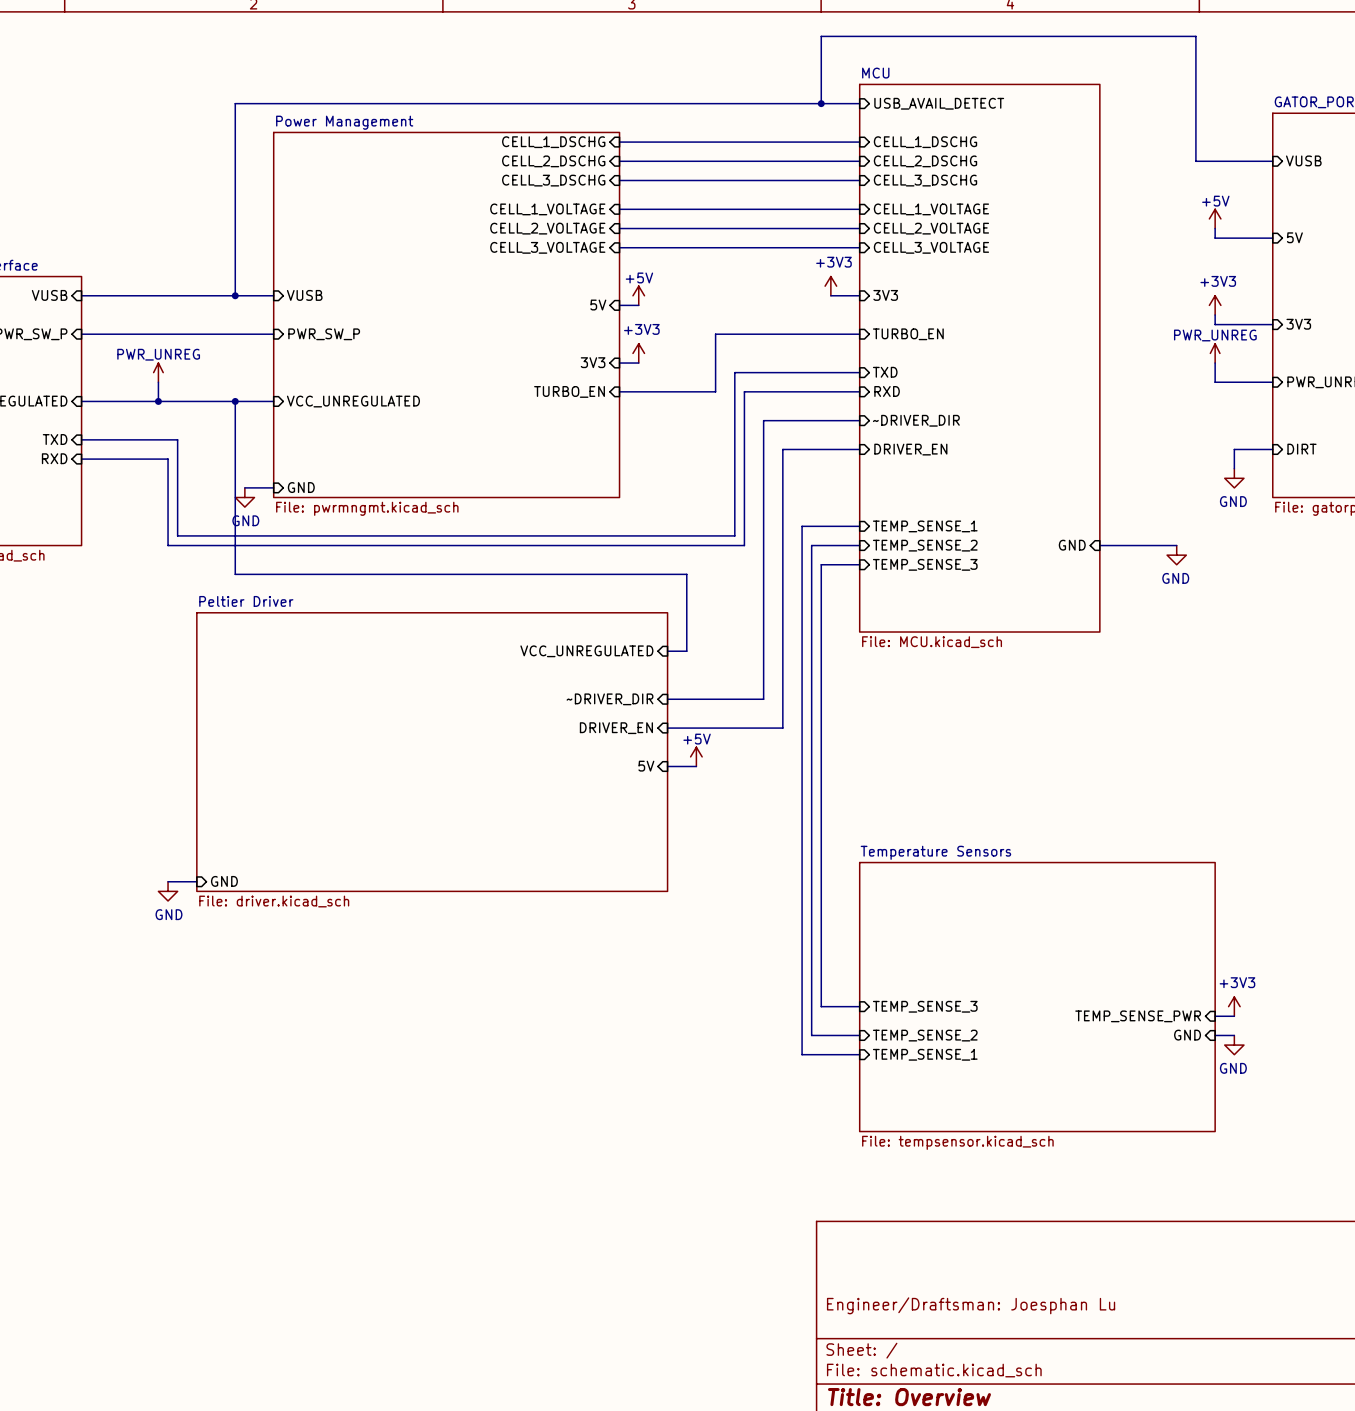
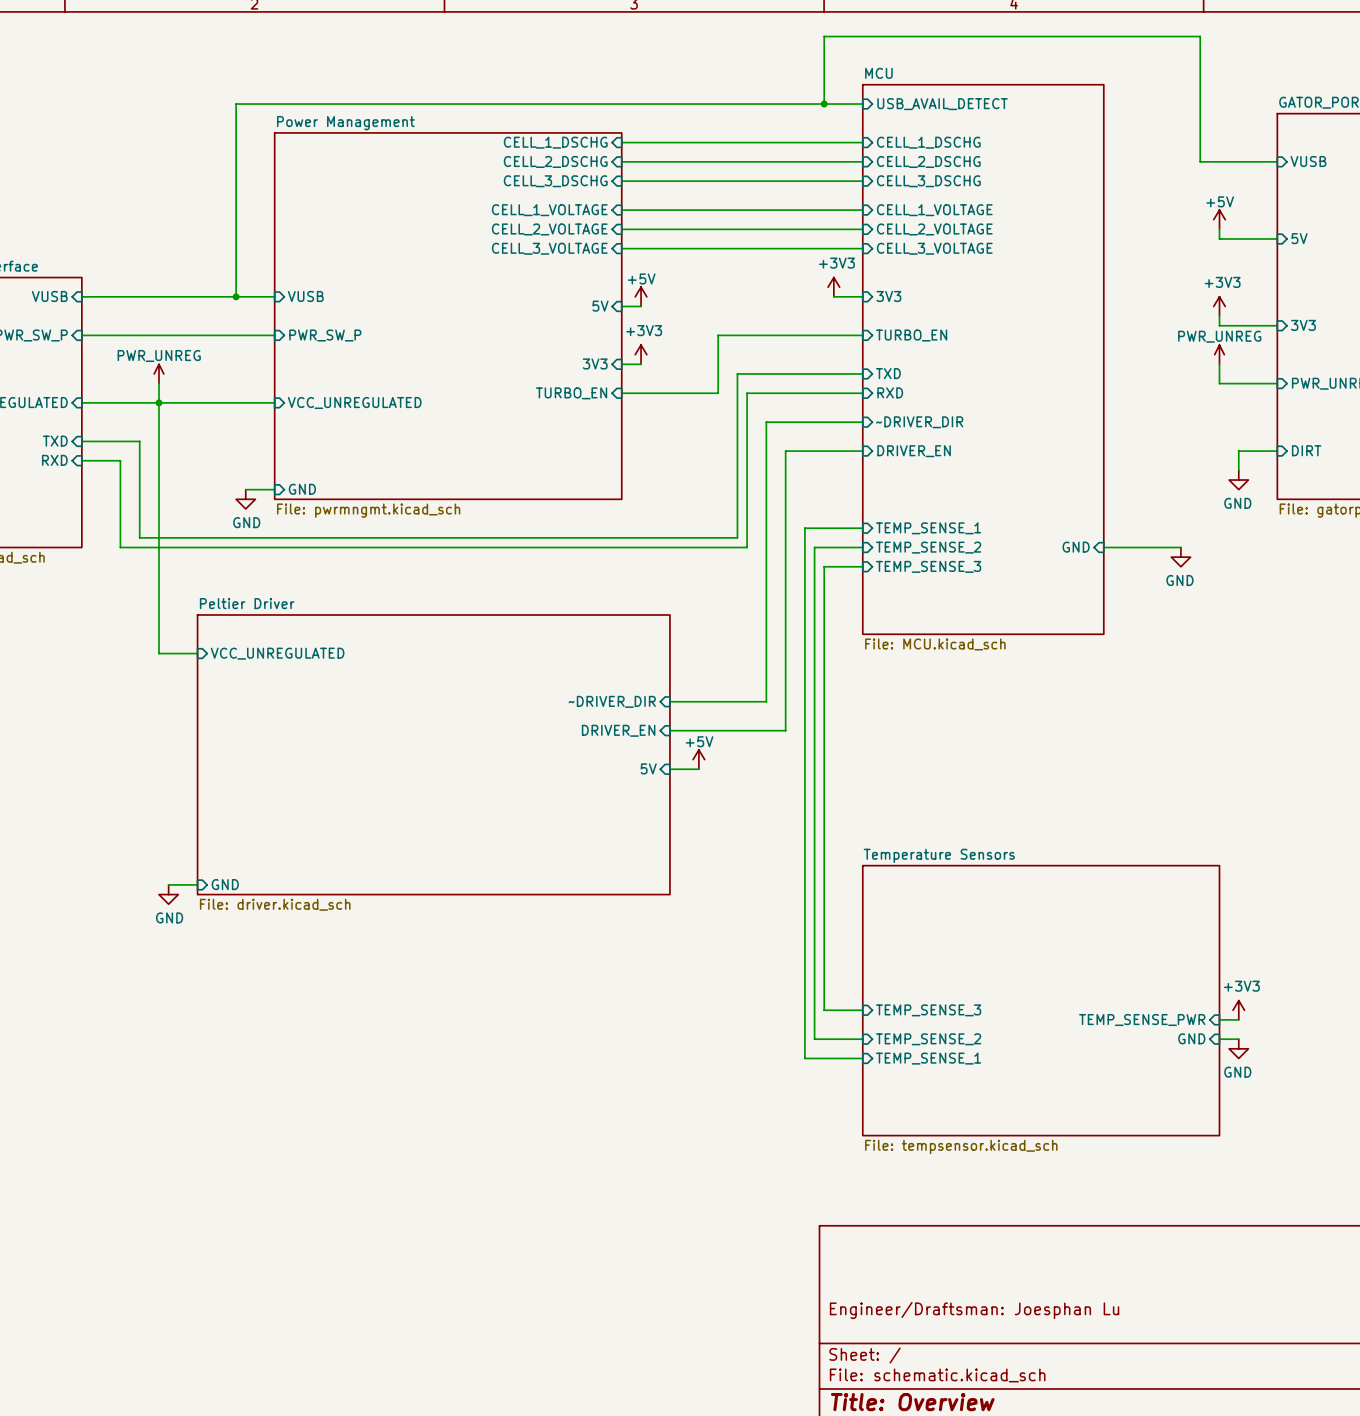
wire: none -> (158, 402) (158, 653) (197, 653)
wire: (235, 401) (235, 574) (686, 574) (686, 651) (667, 651) -> none
junction: (235, 401) -> none
wire: (139, 439) (177, 439) (177, 535) -> (139, 441) (139, 537) (178, 537)
wire: (119, 459) (168, 459) (168, 545) -> (120, 460) (120, 547) (168, 547)
sheet pin: none -> VCC_UNREGULATED (277, 653)
sheet pin: VCC_UNREGULATED (586, 651) -> none

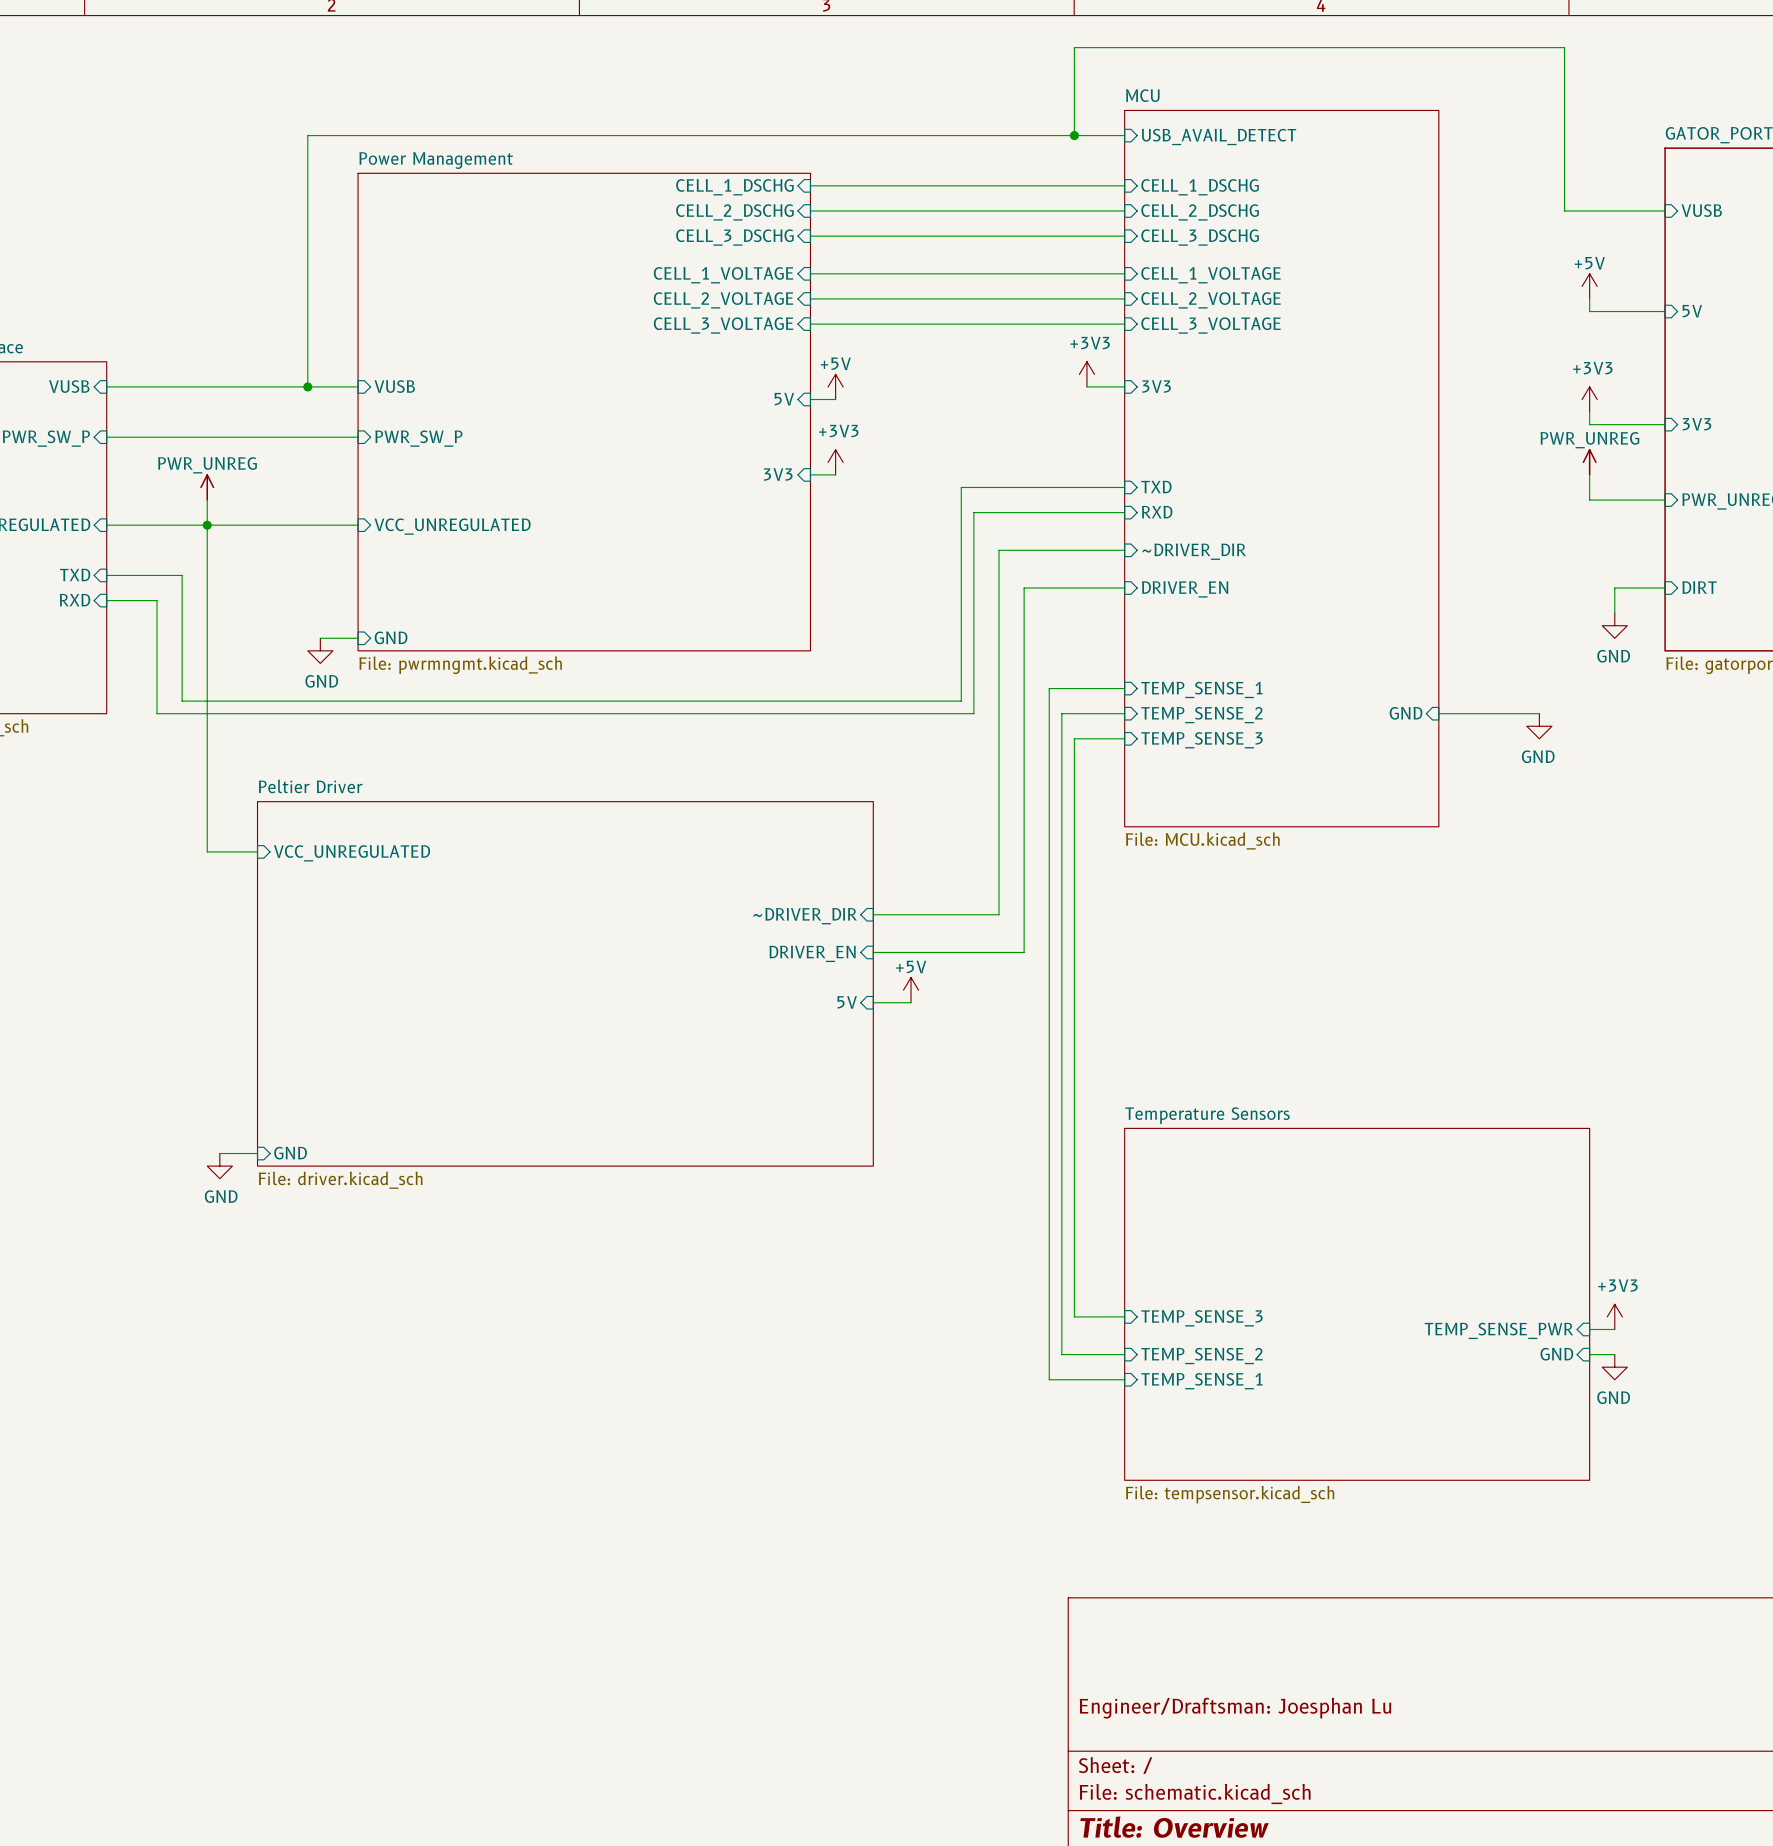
wire: (862, 335) (718, 335) (718, 393) (621, 393) -> none
sheet pin: TURBO_EN (911, 335) -> none
sheet pin: TURBO_EN (571, 393) -> none

